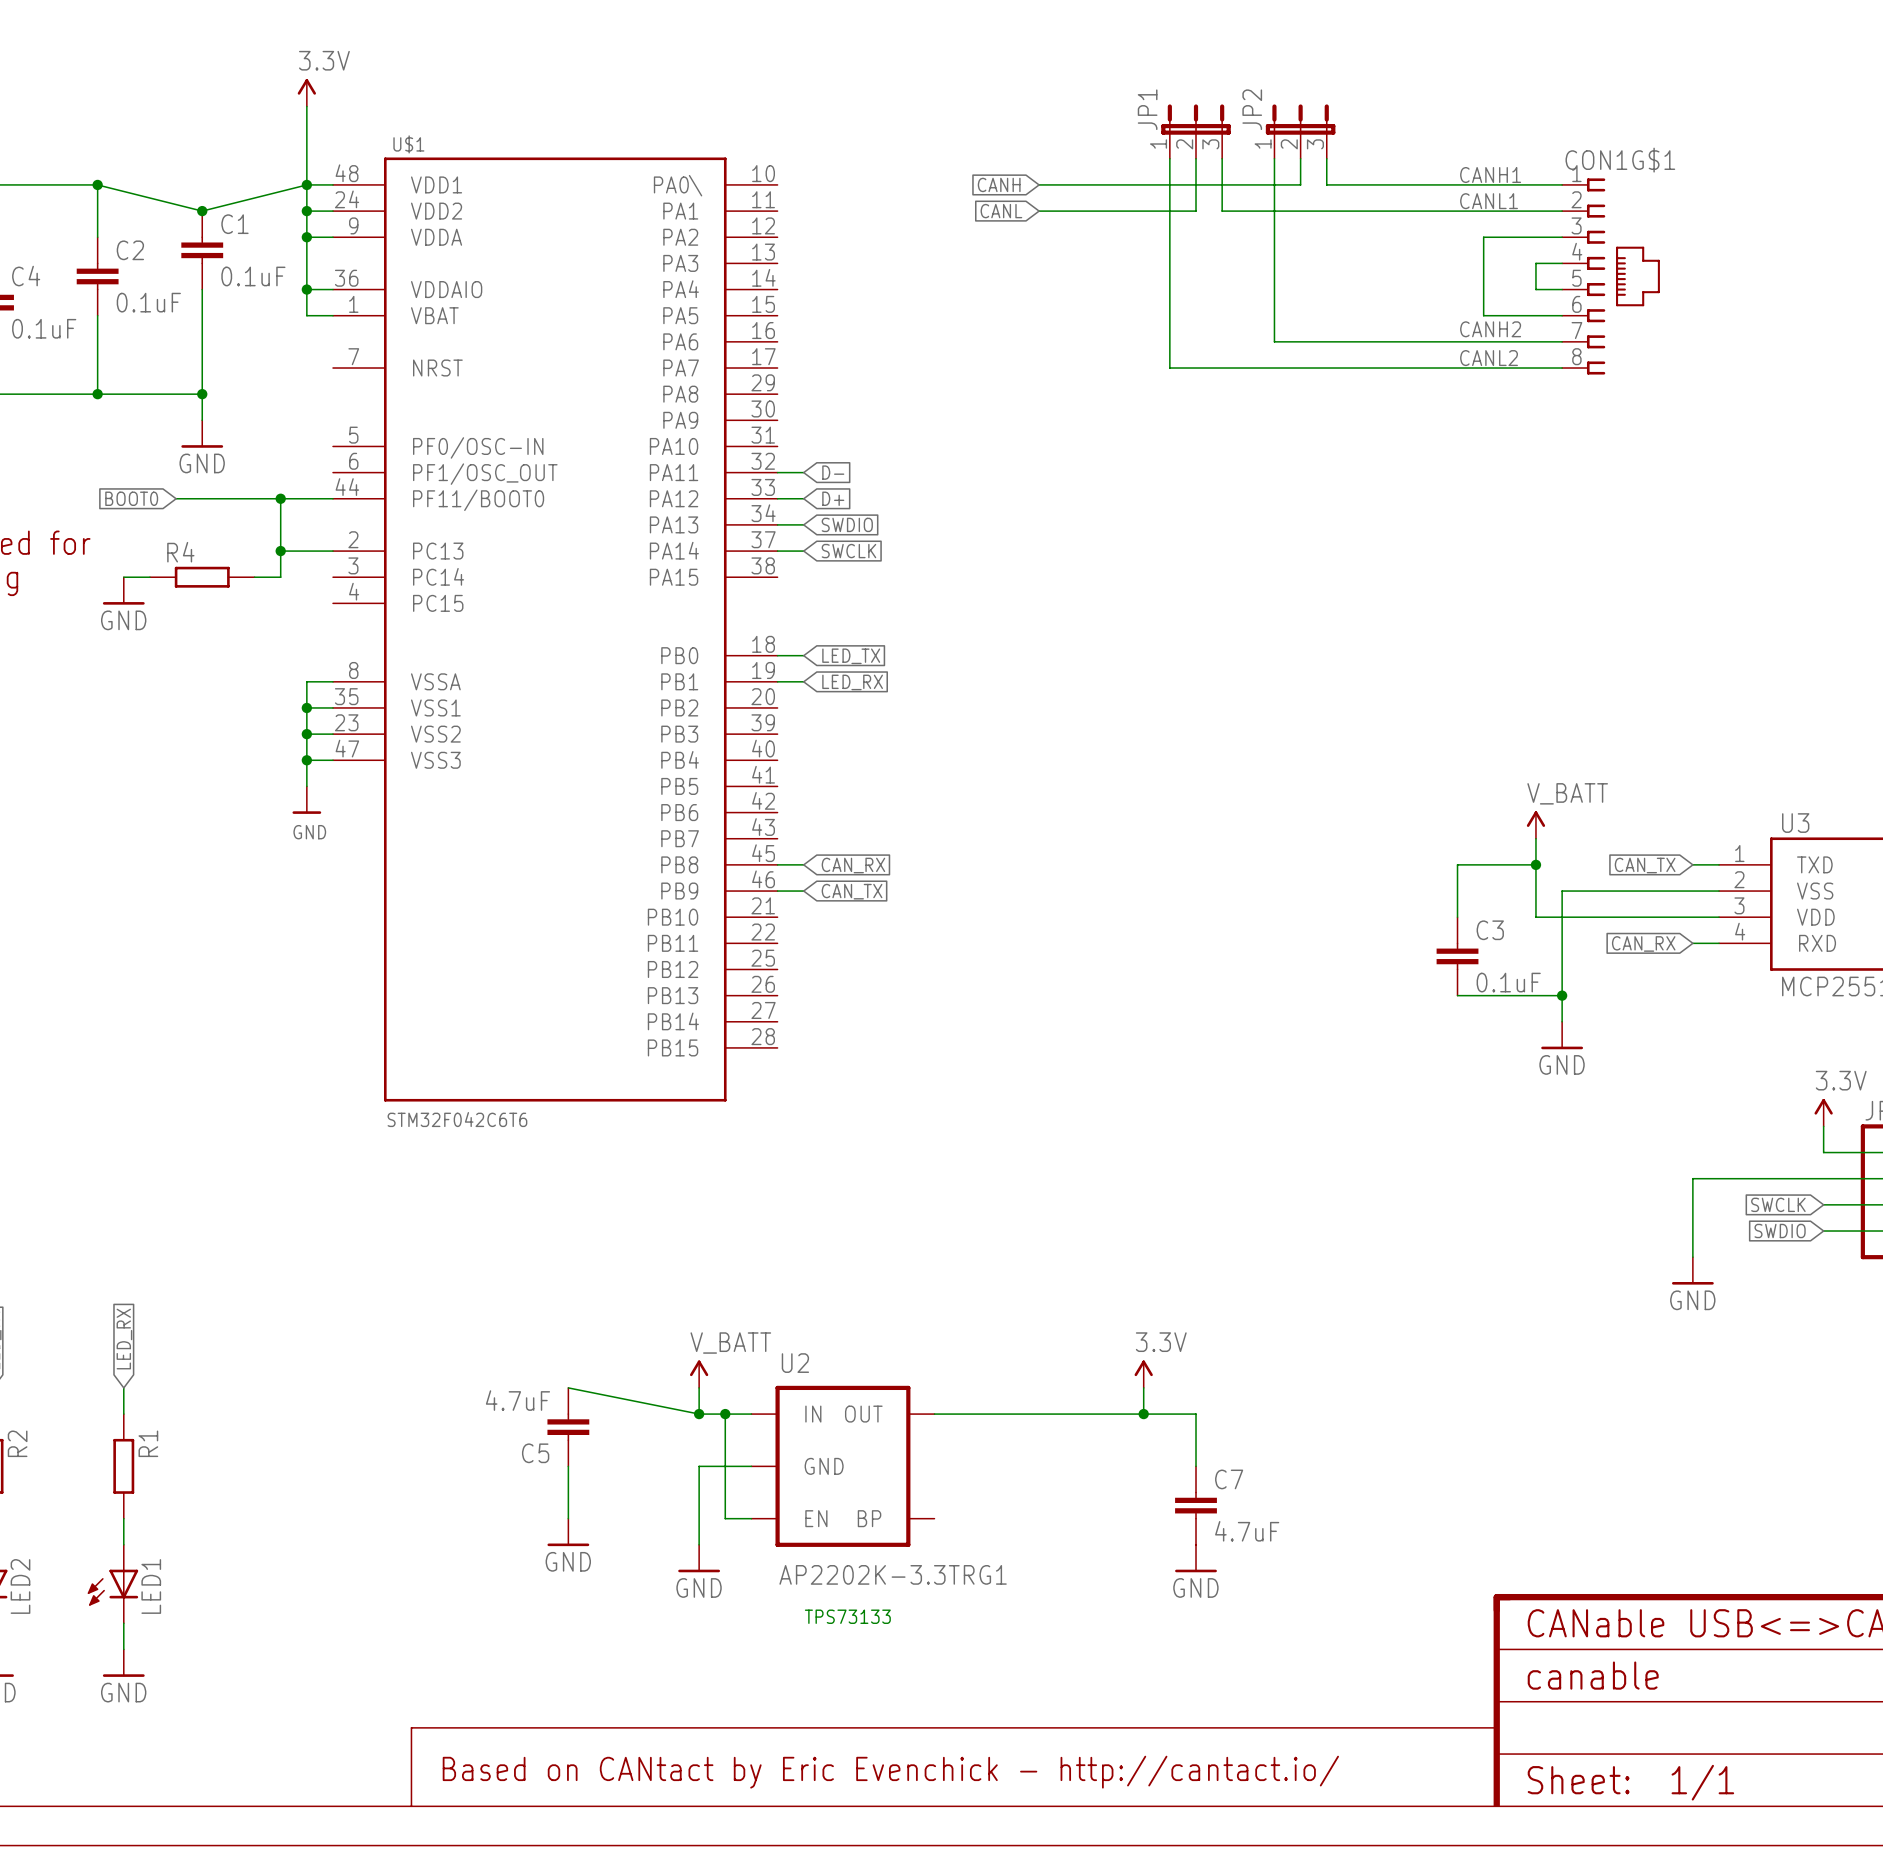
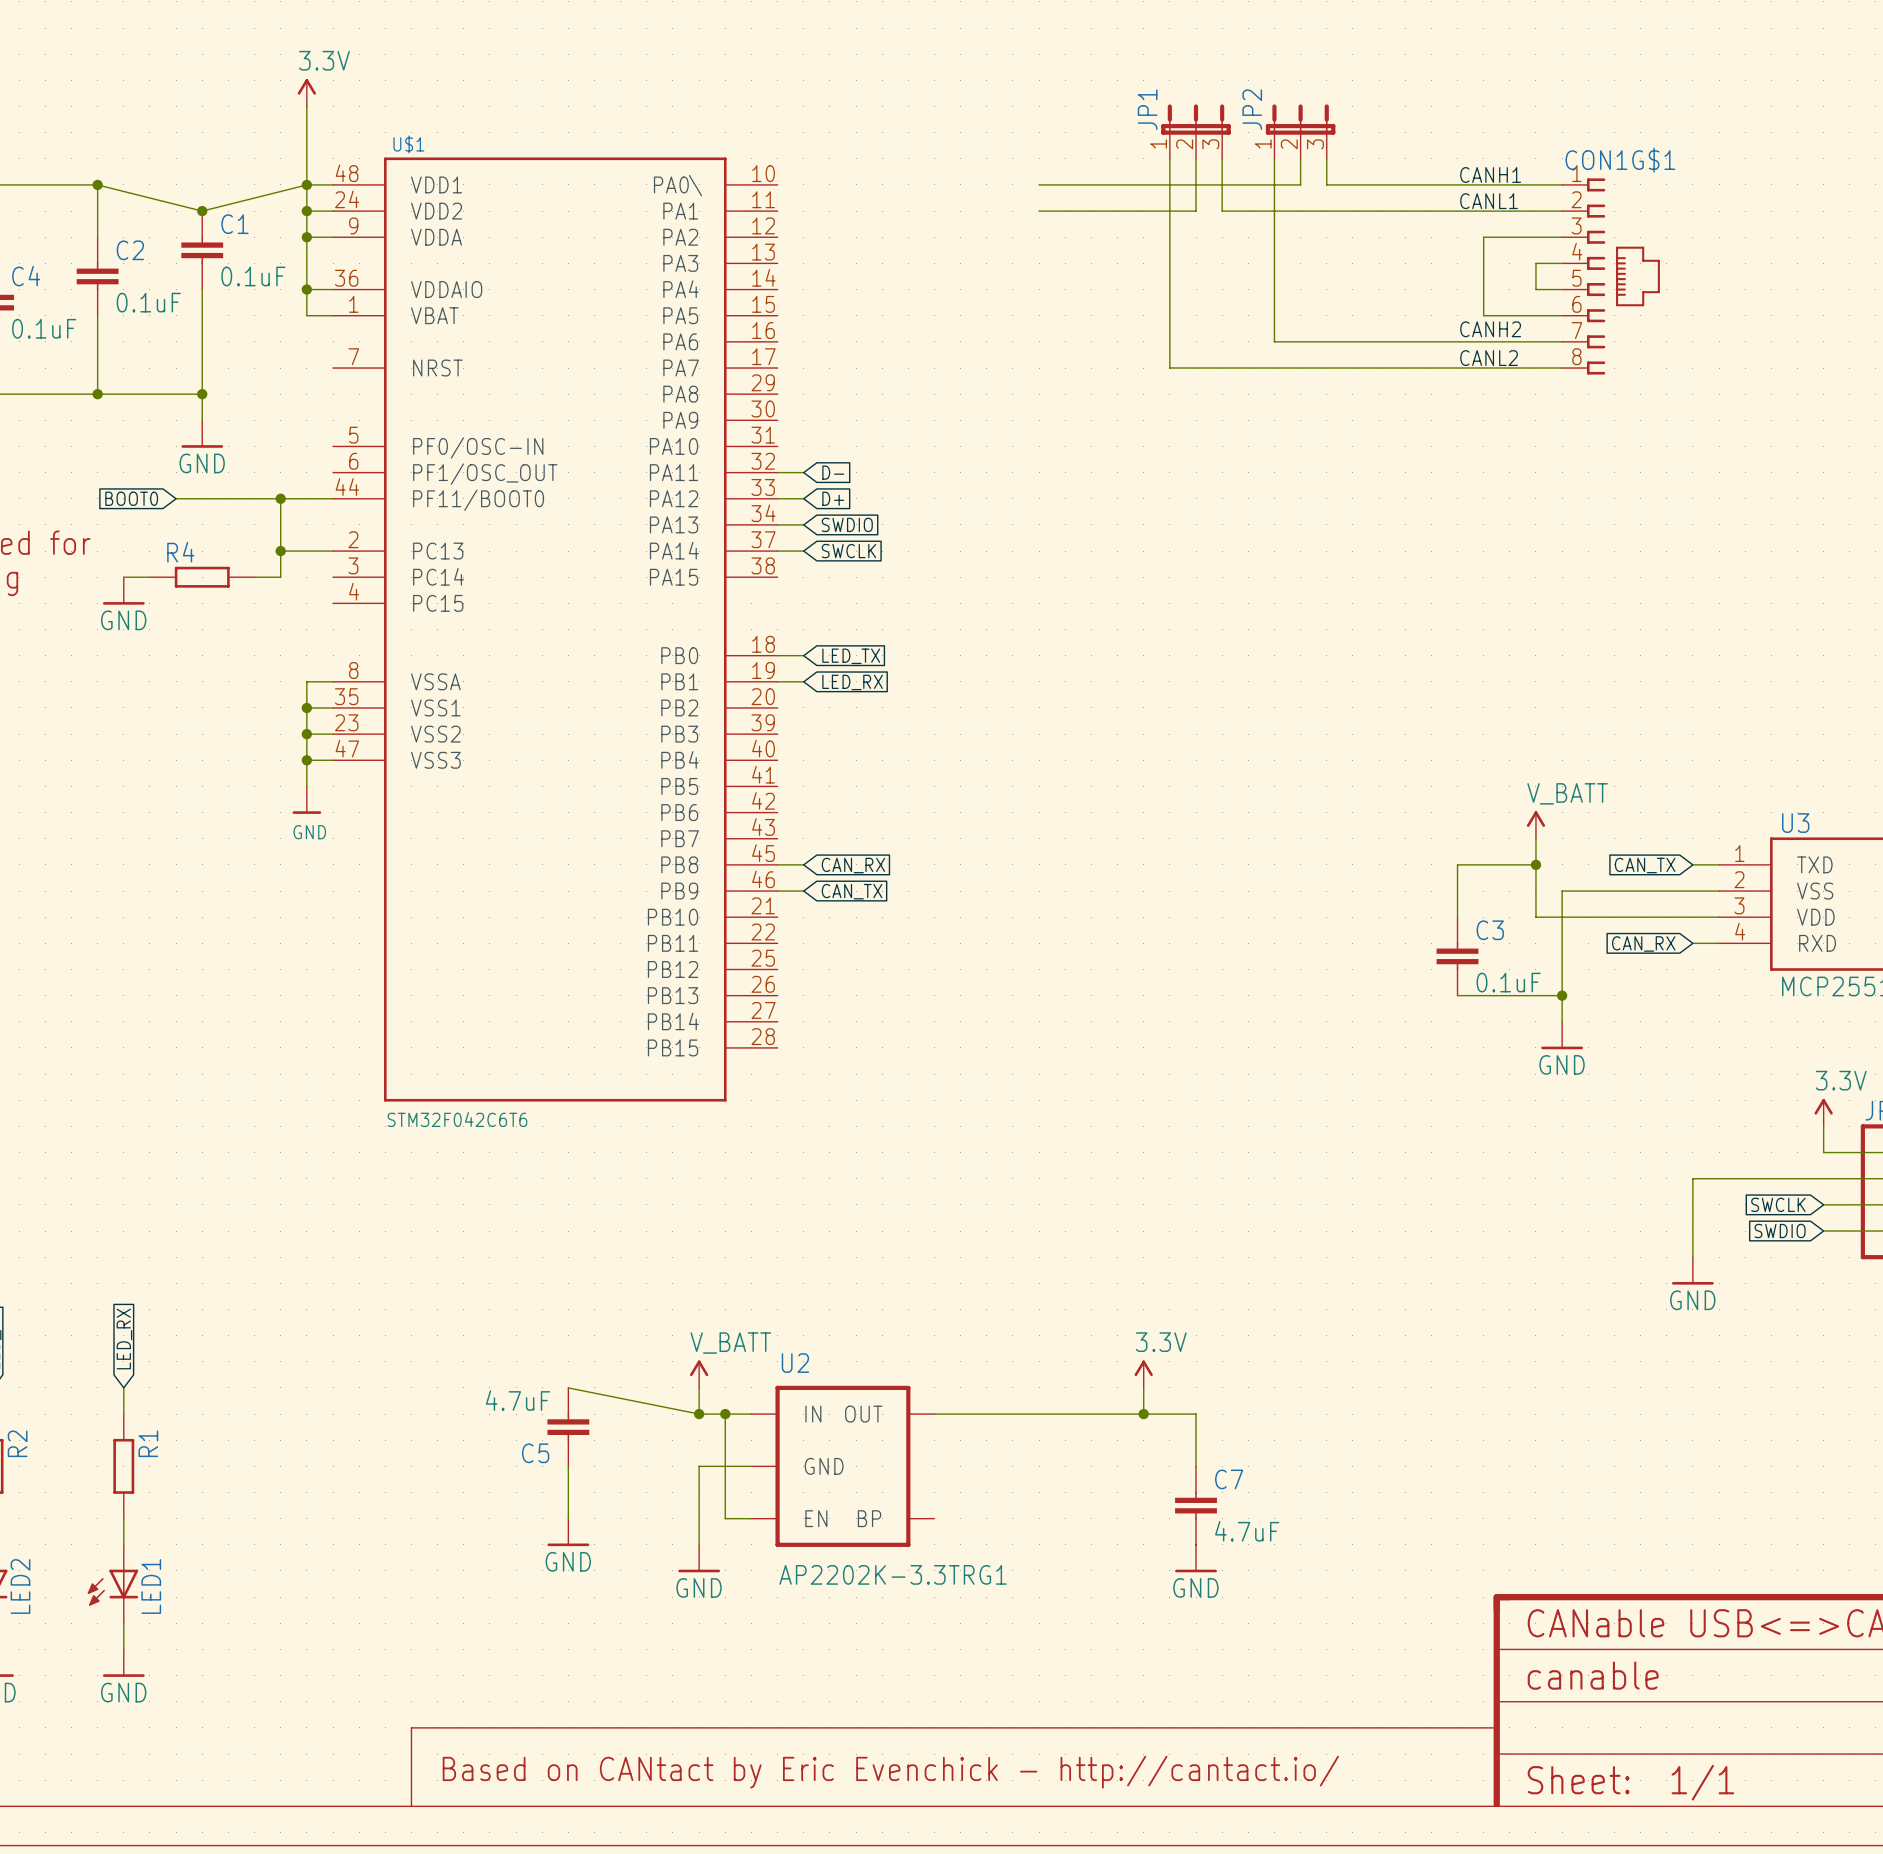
global label: CANH (999, 184) -> none
global label: CANL (1001, 211) -> none
text: TPS73133 (847, 1616) -> none

